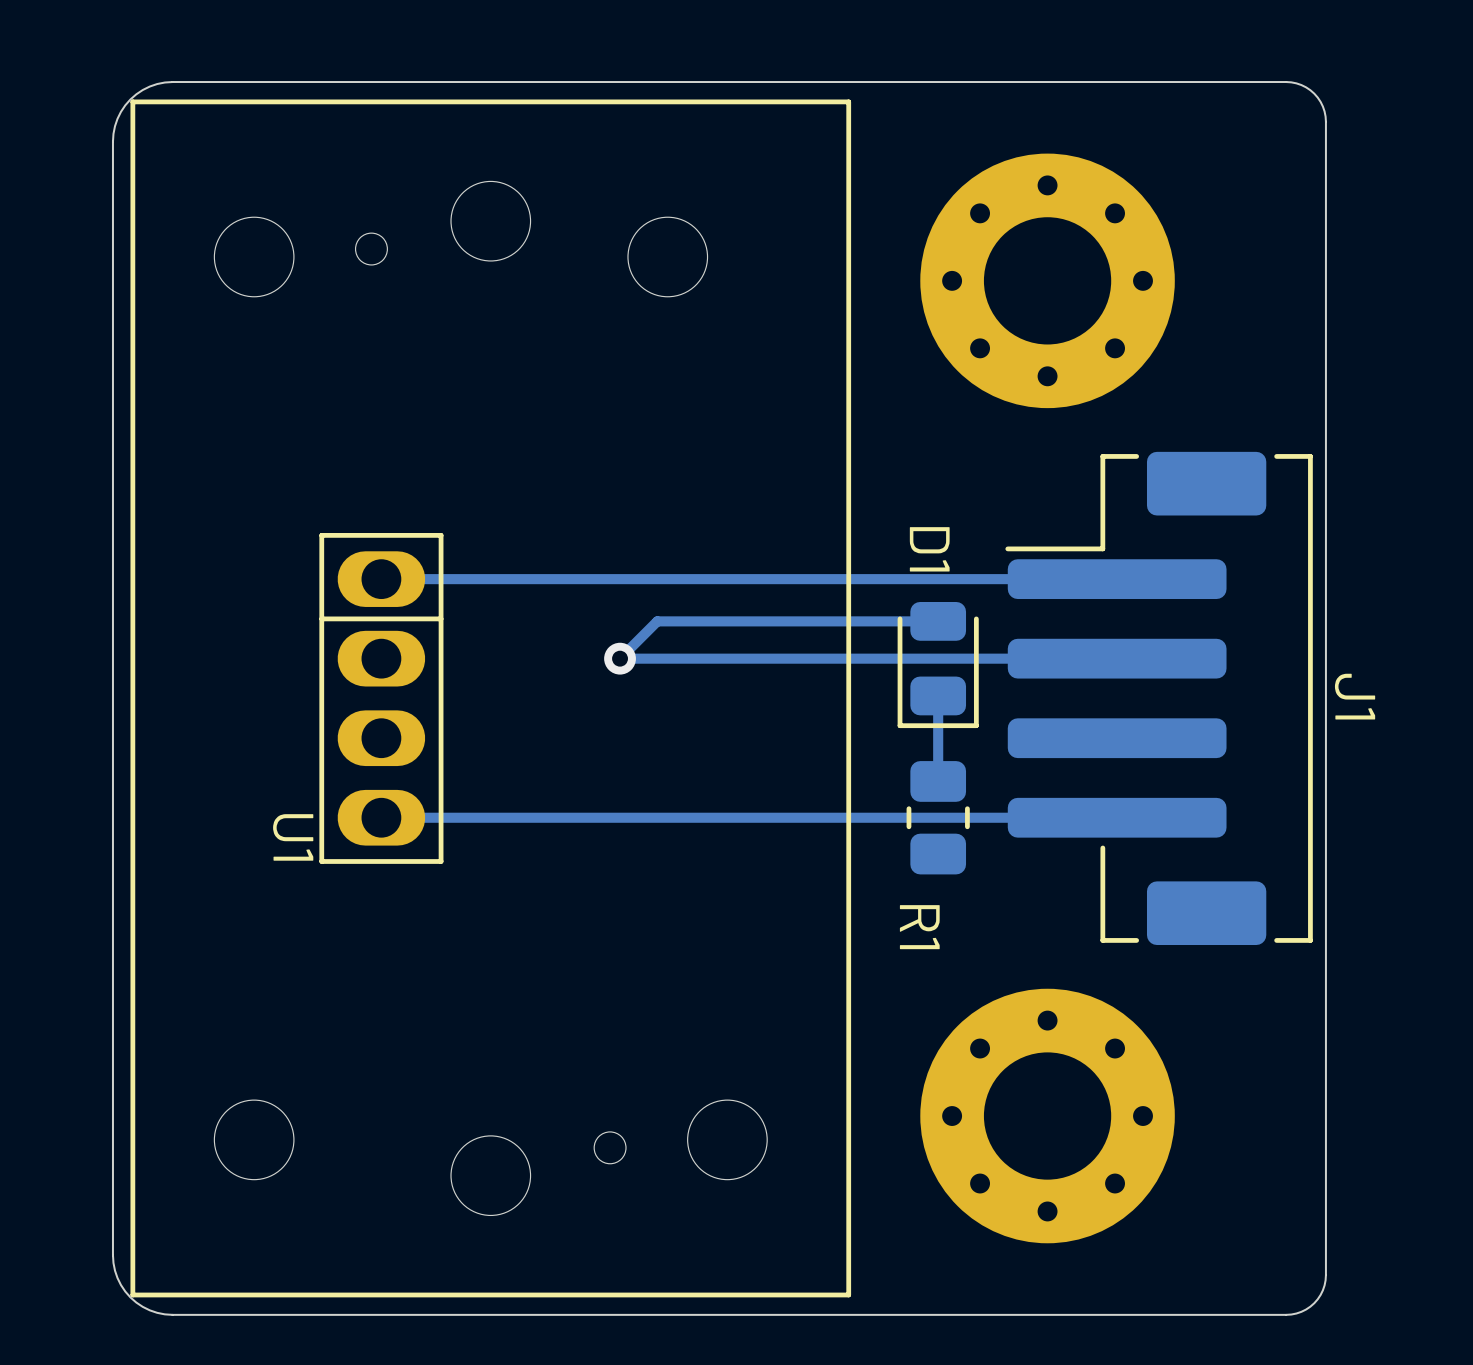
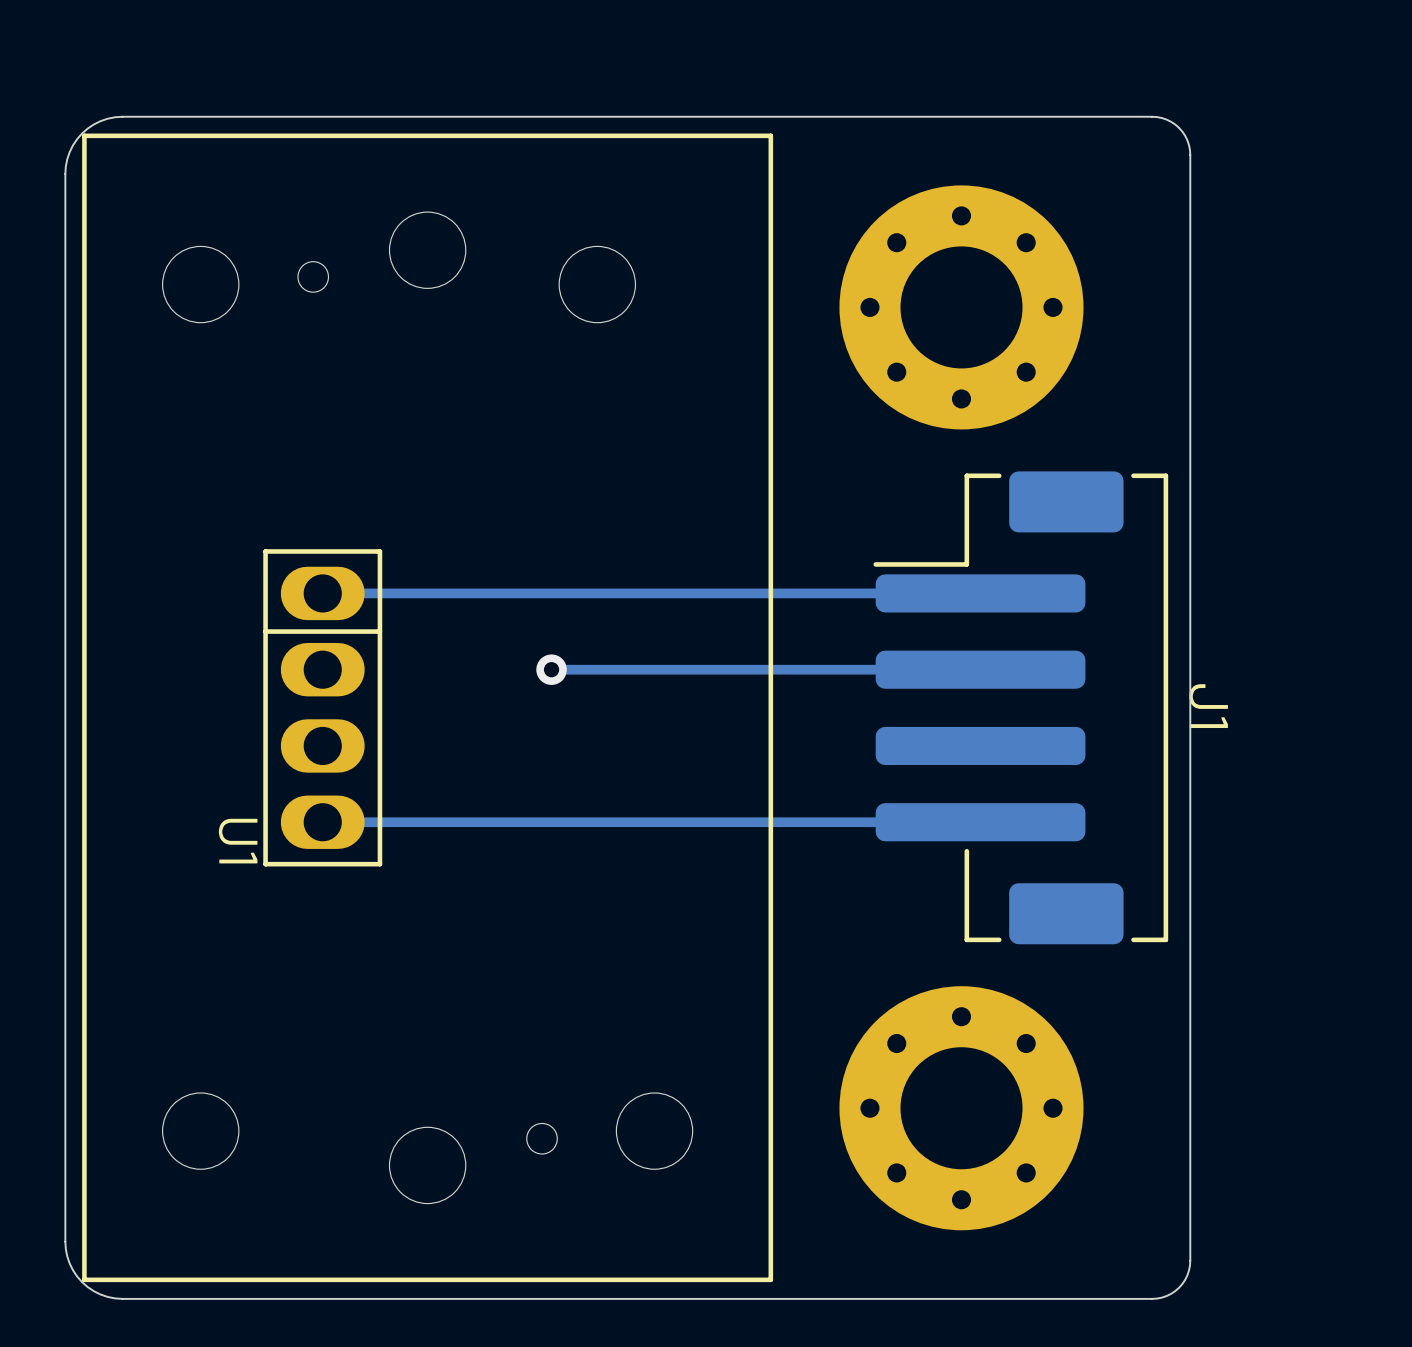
board edge: (1246, 82) (1286, 82) (1301, 85) (1317, 97) (1325, 116) (1325, 1275) (1320, 1294) (1306, 1309) (1291, 1314) (1246, 1314) -> (1152, 116) (1166, 119) (1179, 127) (1187, 140) (1190, 154) (1190, 1260) (1187, 1275) (1179, 1287) (1166, 1296) (1152, 1298)
track: (938, 621) (657, 621) (620, 658) -> none
D1: (938, 665) -> none
track: (938, 695) (938, 781) -> none
J1 position: (1159, 698) -> (1020, 707)
R1: (938, 817) -> none

